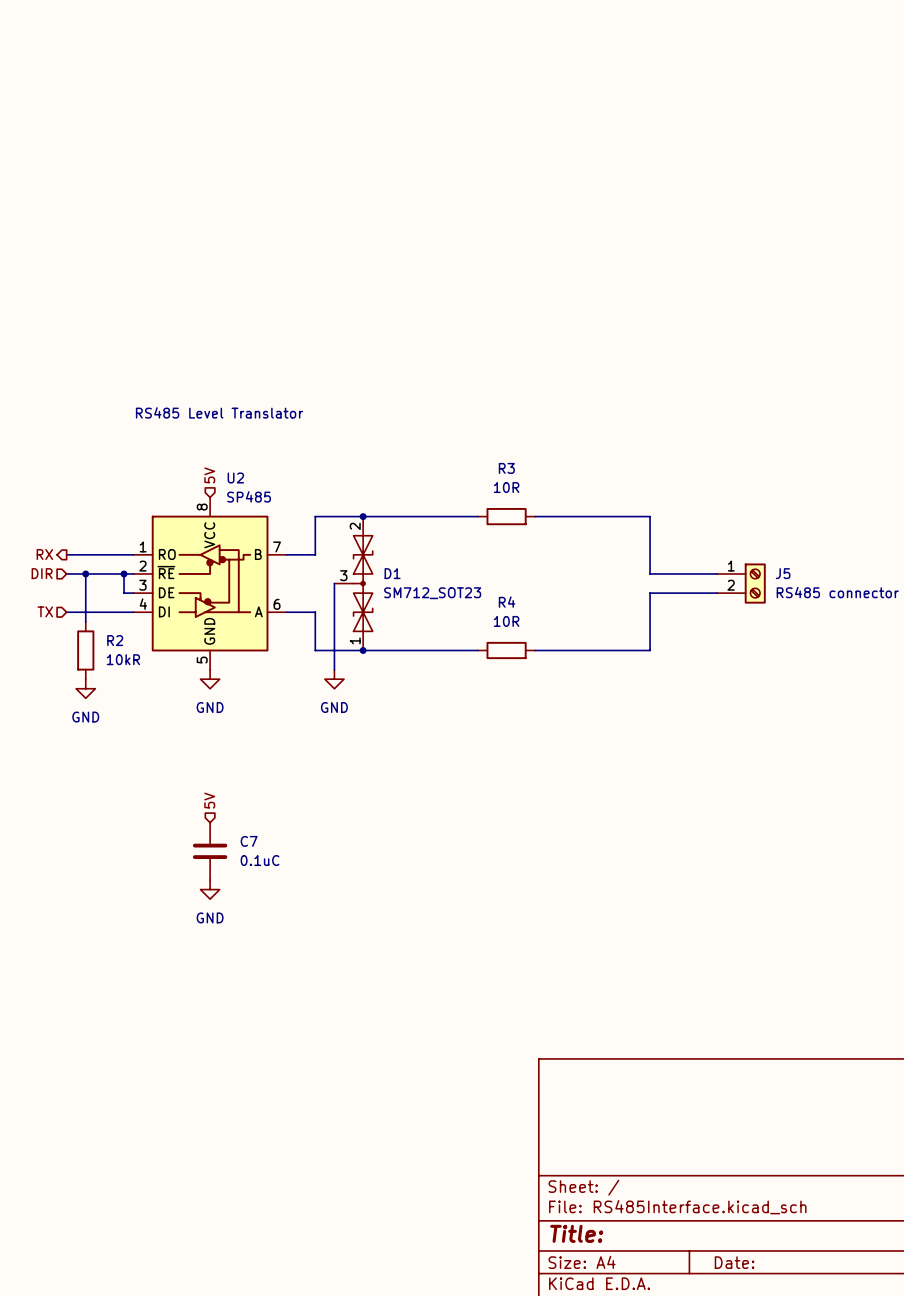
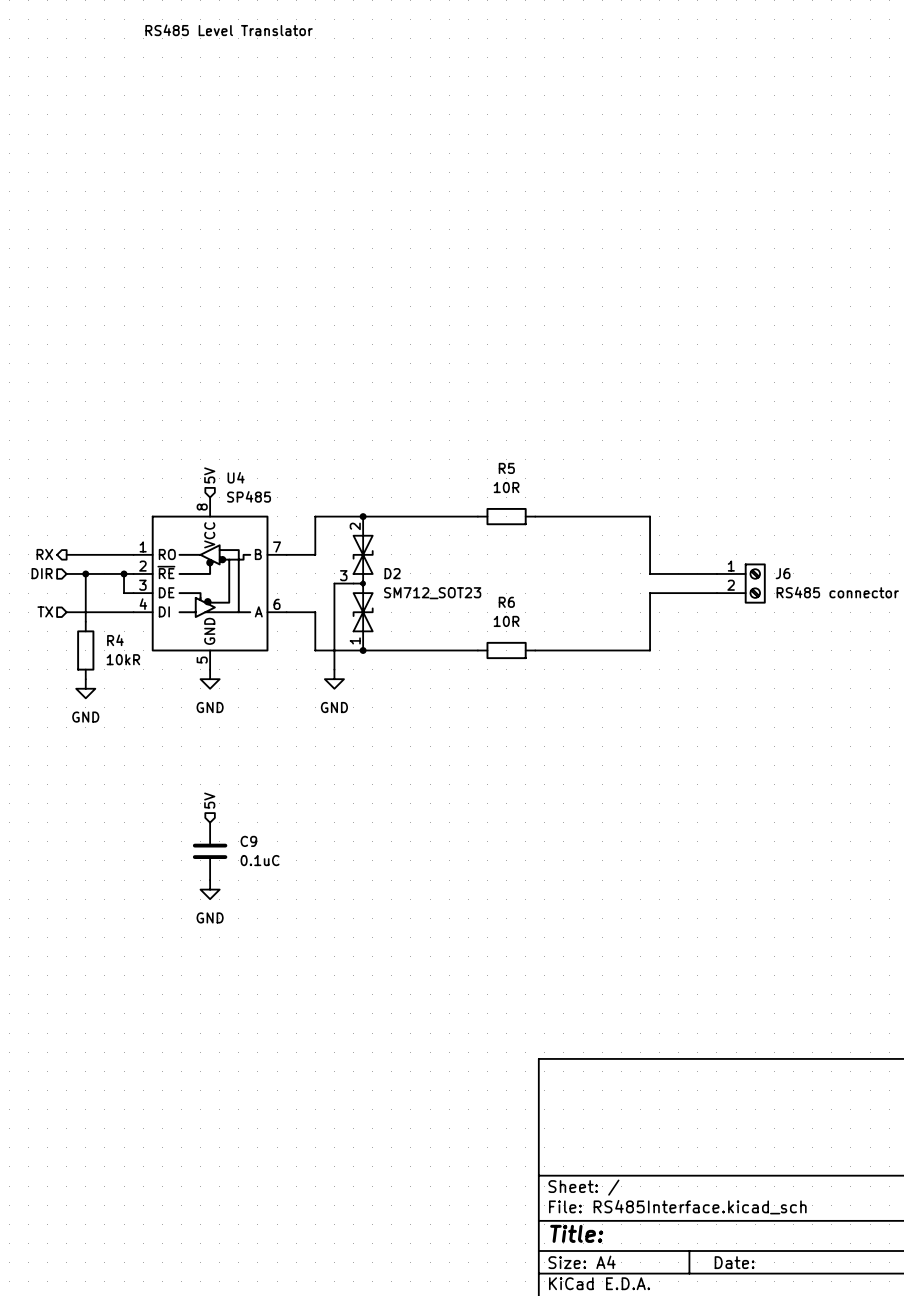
text: none -> RS485 Level Translator (229, 30)
text: RS485 Level Translator (219, 412) -> none
R3 name: R3 (506, 468) -> R5 (506, 468)
U2 name: U2 (235, 477) -> U4 (236, 477)
D1 name: D1 (392, 573) -> D2 (392, 573)
J5 name: J5 (783, 573) -> J6 (783, 573)
R4 name: R4 (507, 602) -> R6 (506, 602)
R2 name: R2 (115, 640) -> R4 (115, 640)
C7 name: C7 (249, 841) -> C9 (248, 841)

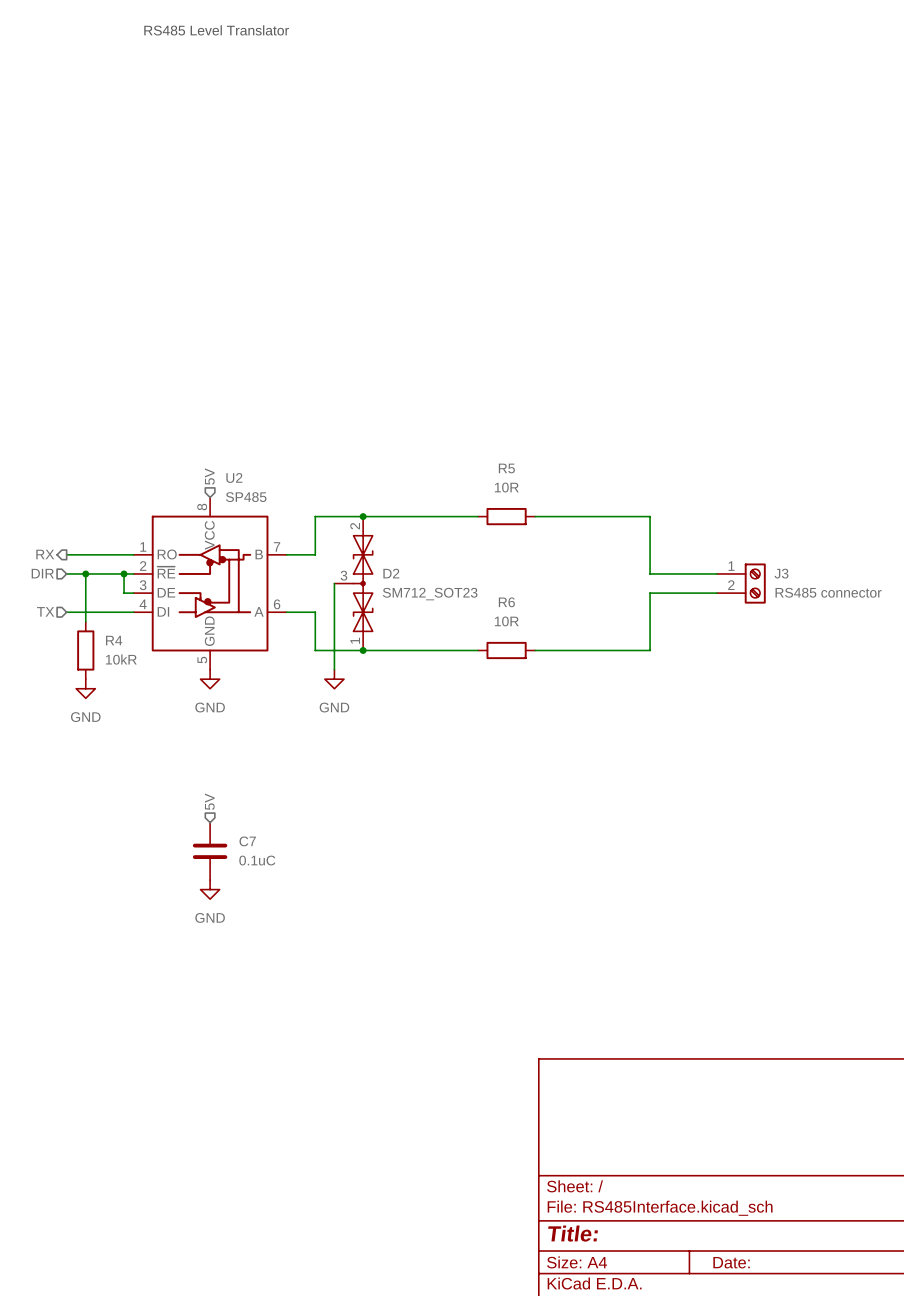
U4 name: U4 (236, 477) -> U2 (234, 477)
J6 name: J6 (783, 573) -> J3 (781, 573)
C9 name: C9 (248, 841) -> C7 (247, 841)

